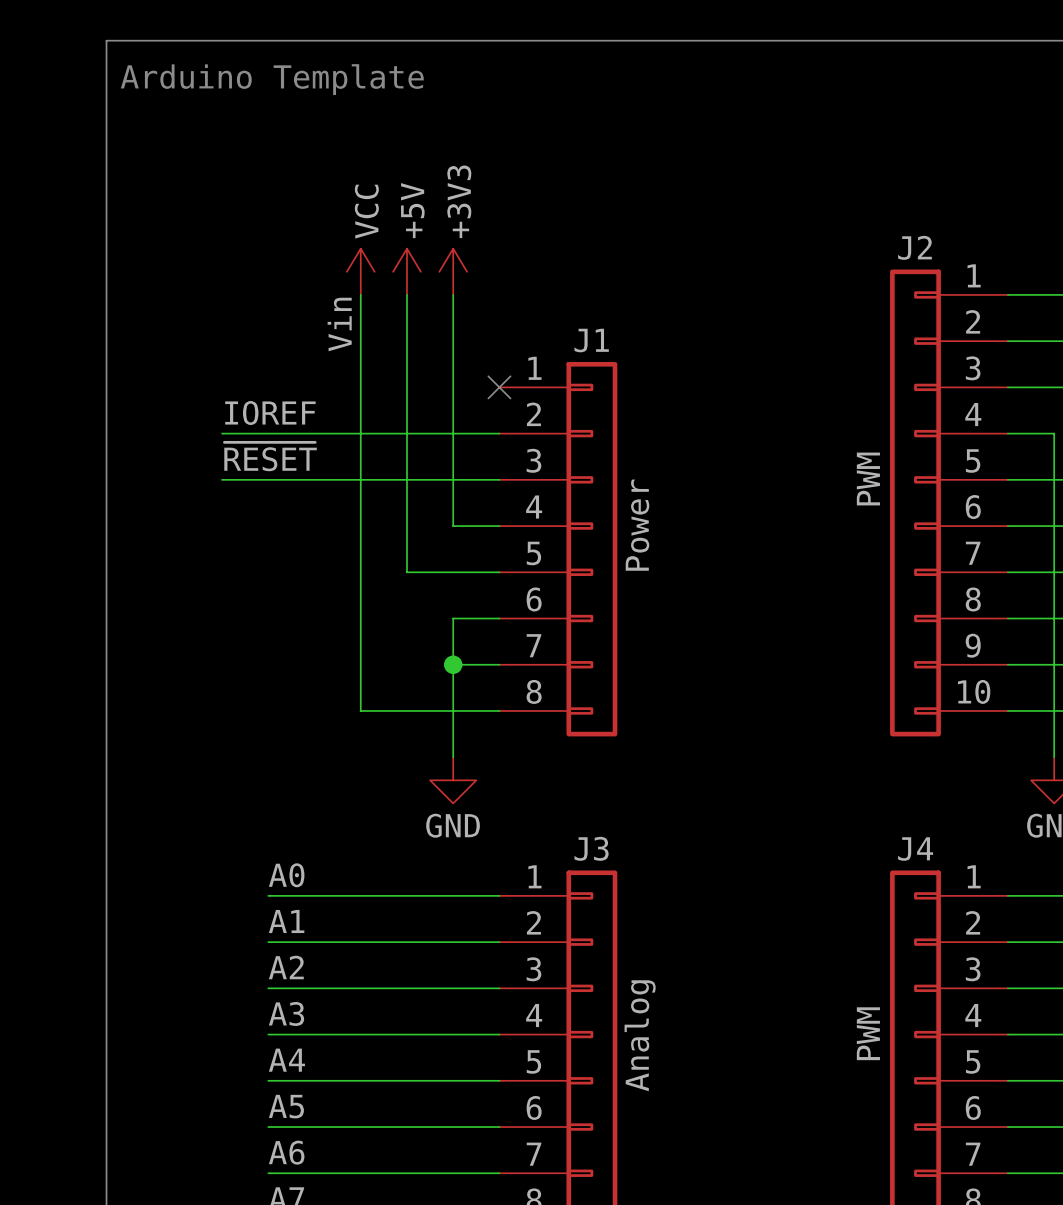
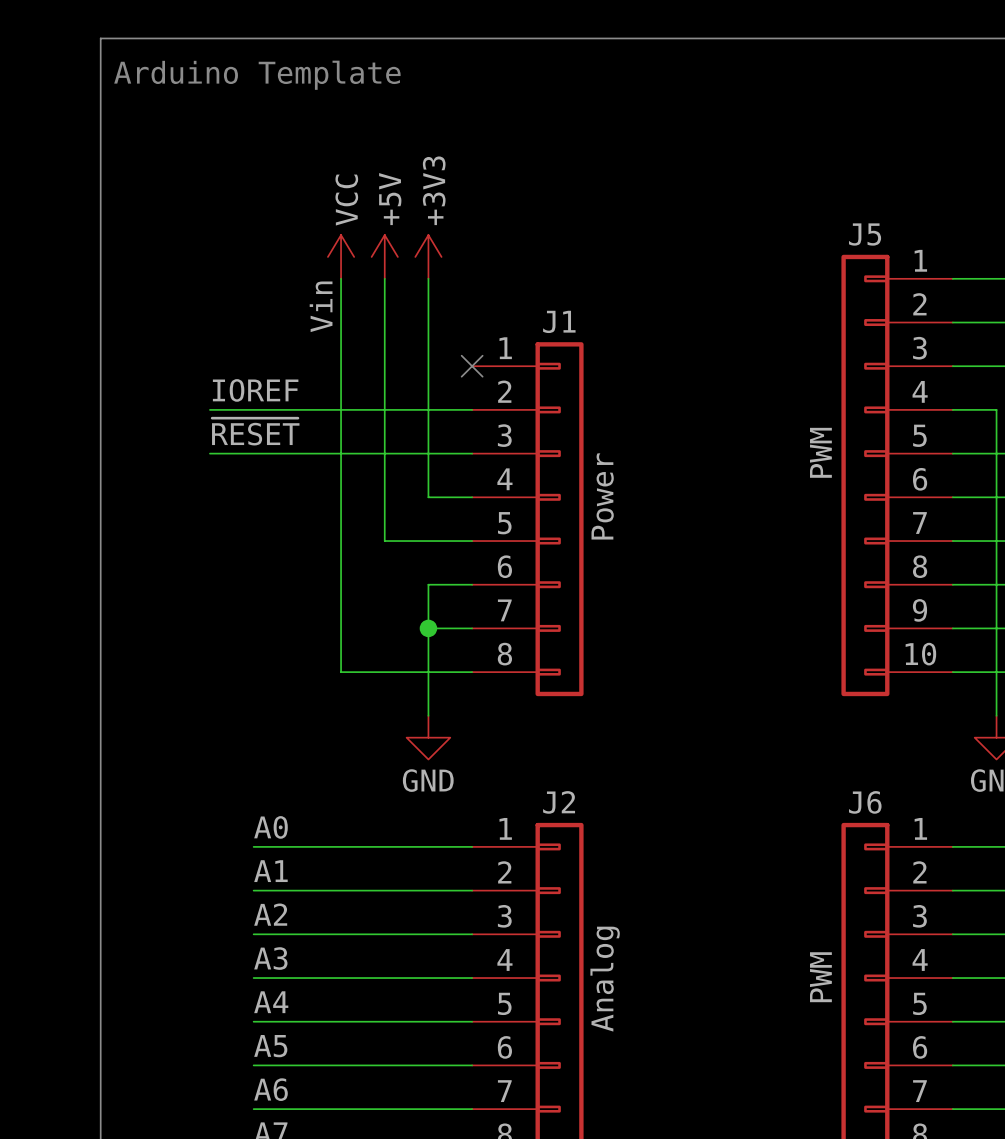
J2 name: J2 (914, 247) -> J5 (865, 234)
J3 name: J3 (591, 848) -> J2 (559, 802)
J4 name: J4 (915, 849) -> J6 (865, 802)

